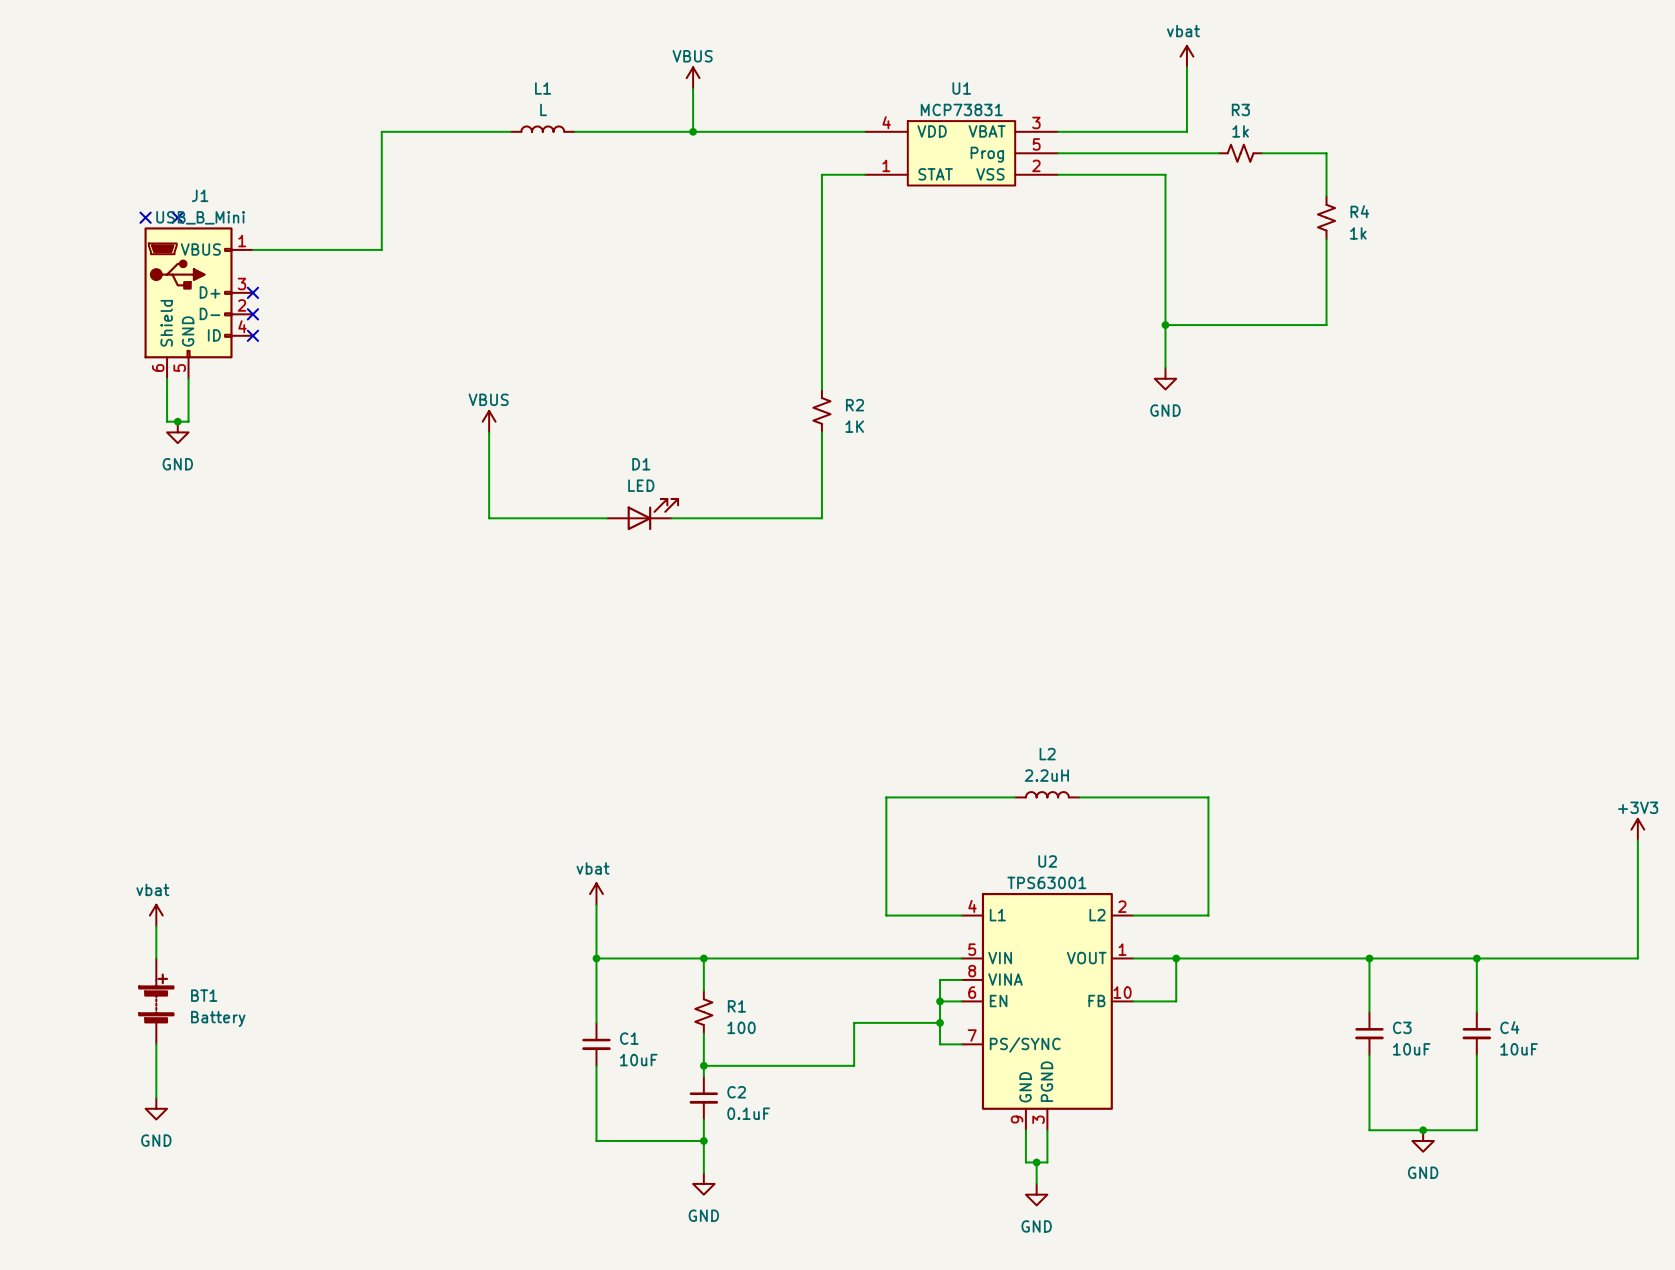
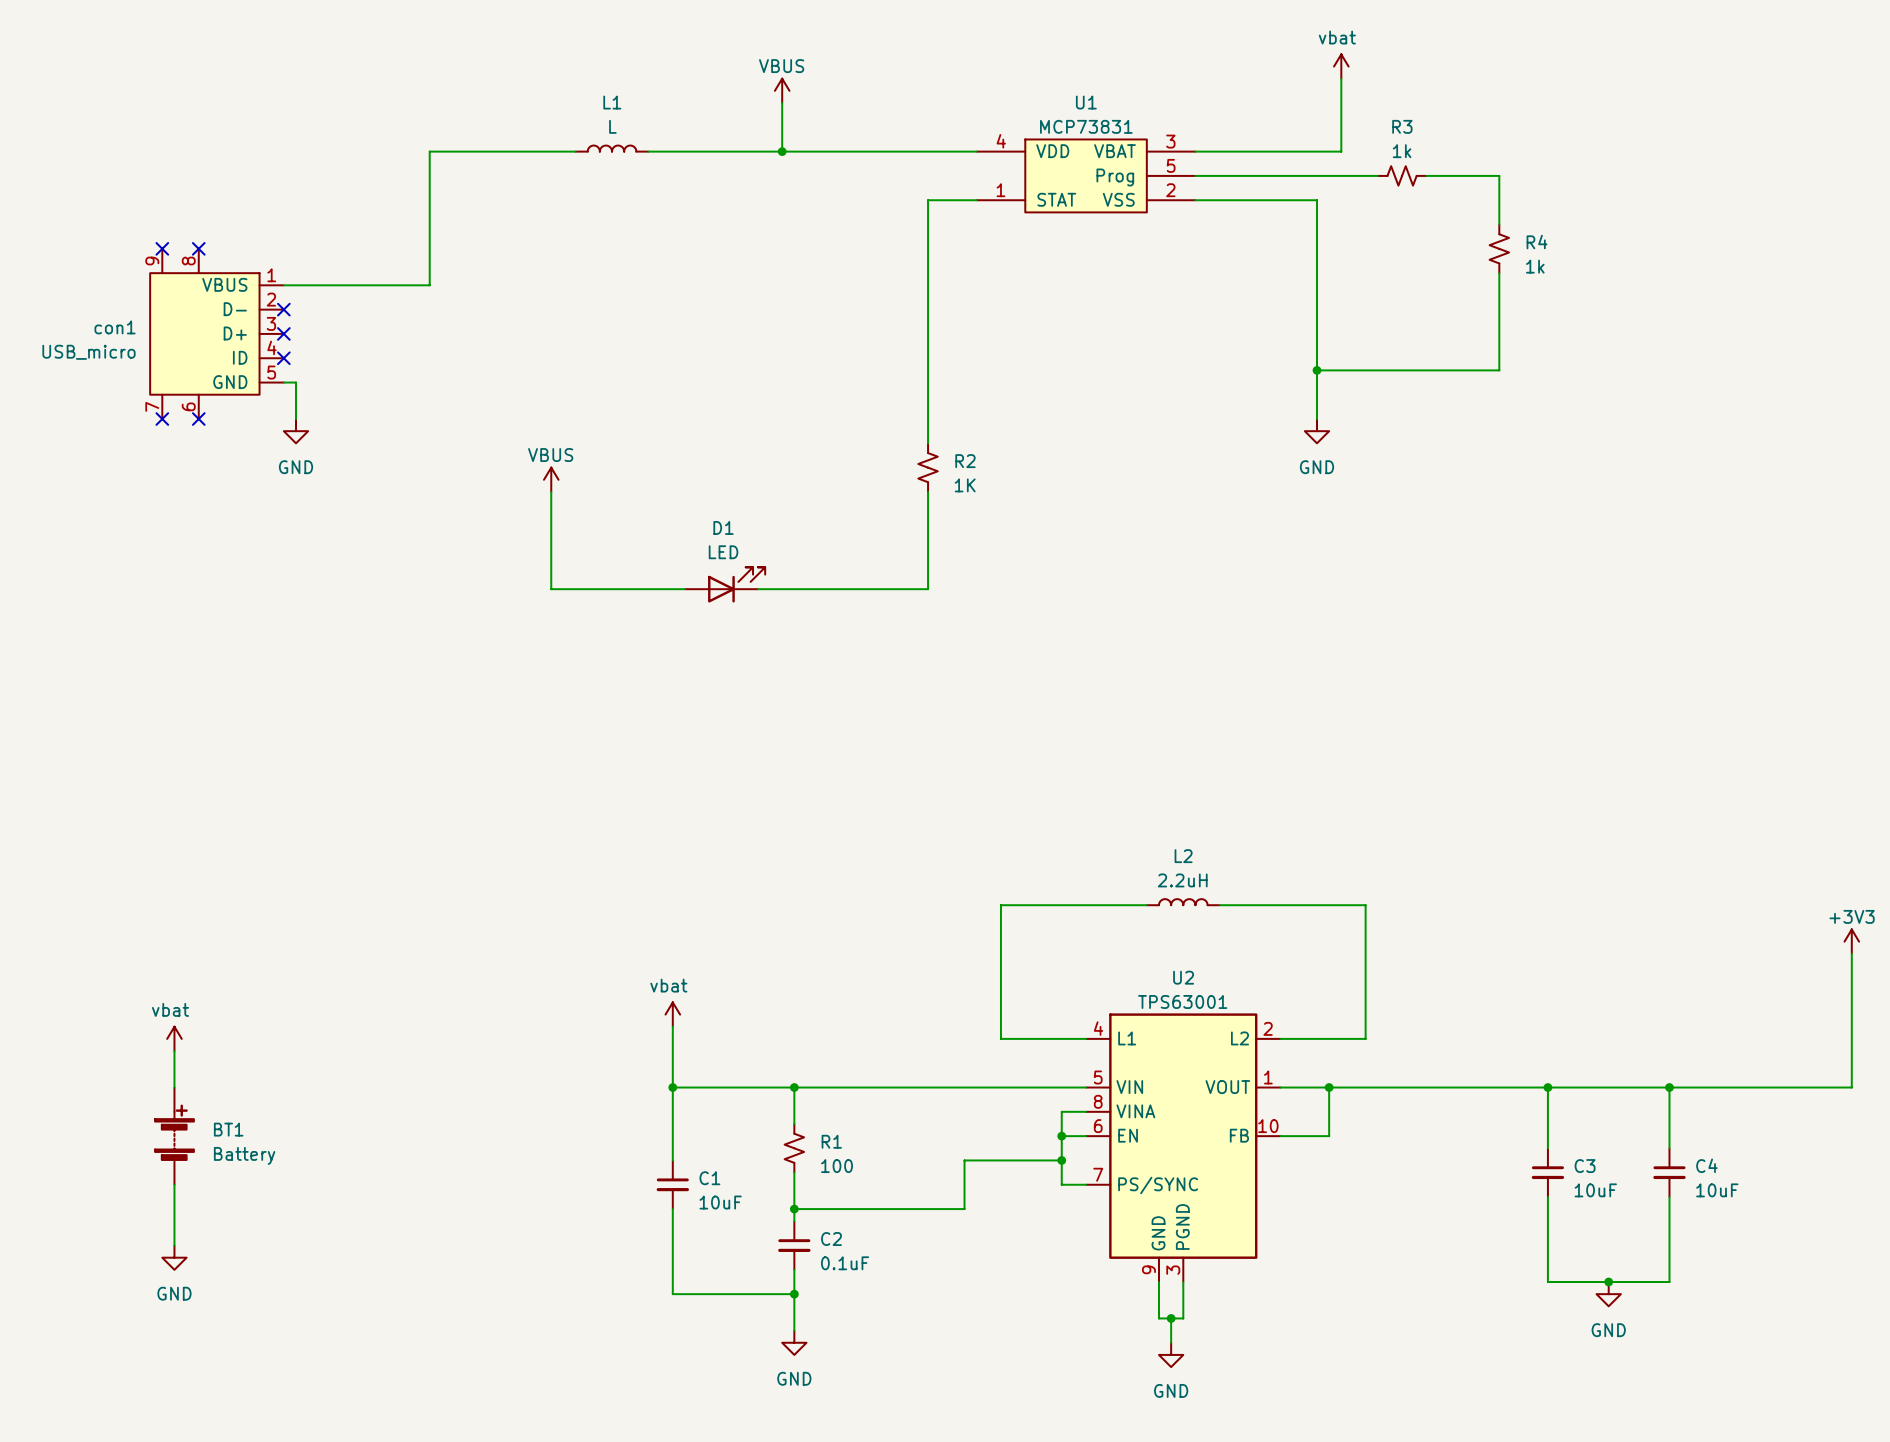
no-connect mark: none -> (283, 309)
con1: none -> USB_micro (217, 333)
J1: USB_B_Mini (198, 303) -> none
wire: none -> (283, 382) (296, 382) (296, 419)
no-connect mark: (252, 335) -> none
no-connect mark: none -> (162, 419)
no-connect mark: none -> (198, 419)
wire: (167, 378) (167, 421) (188, 421) (188, 378) -> none
junction: (177, 421) -> none
power symbol position: GND (177, 432) -> GND (296, 431)

